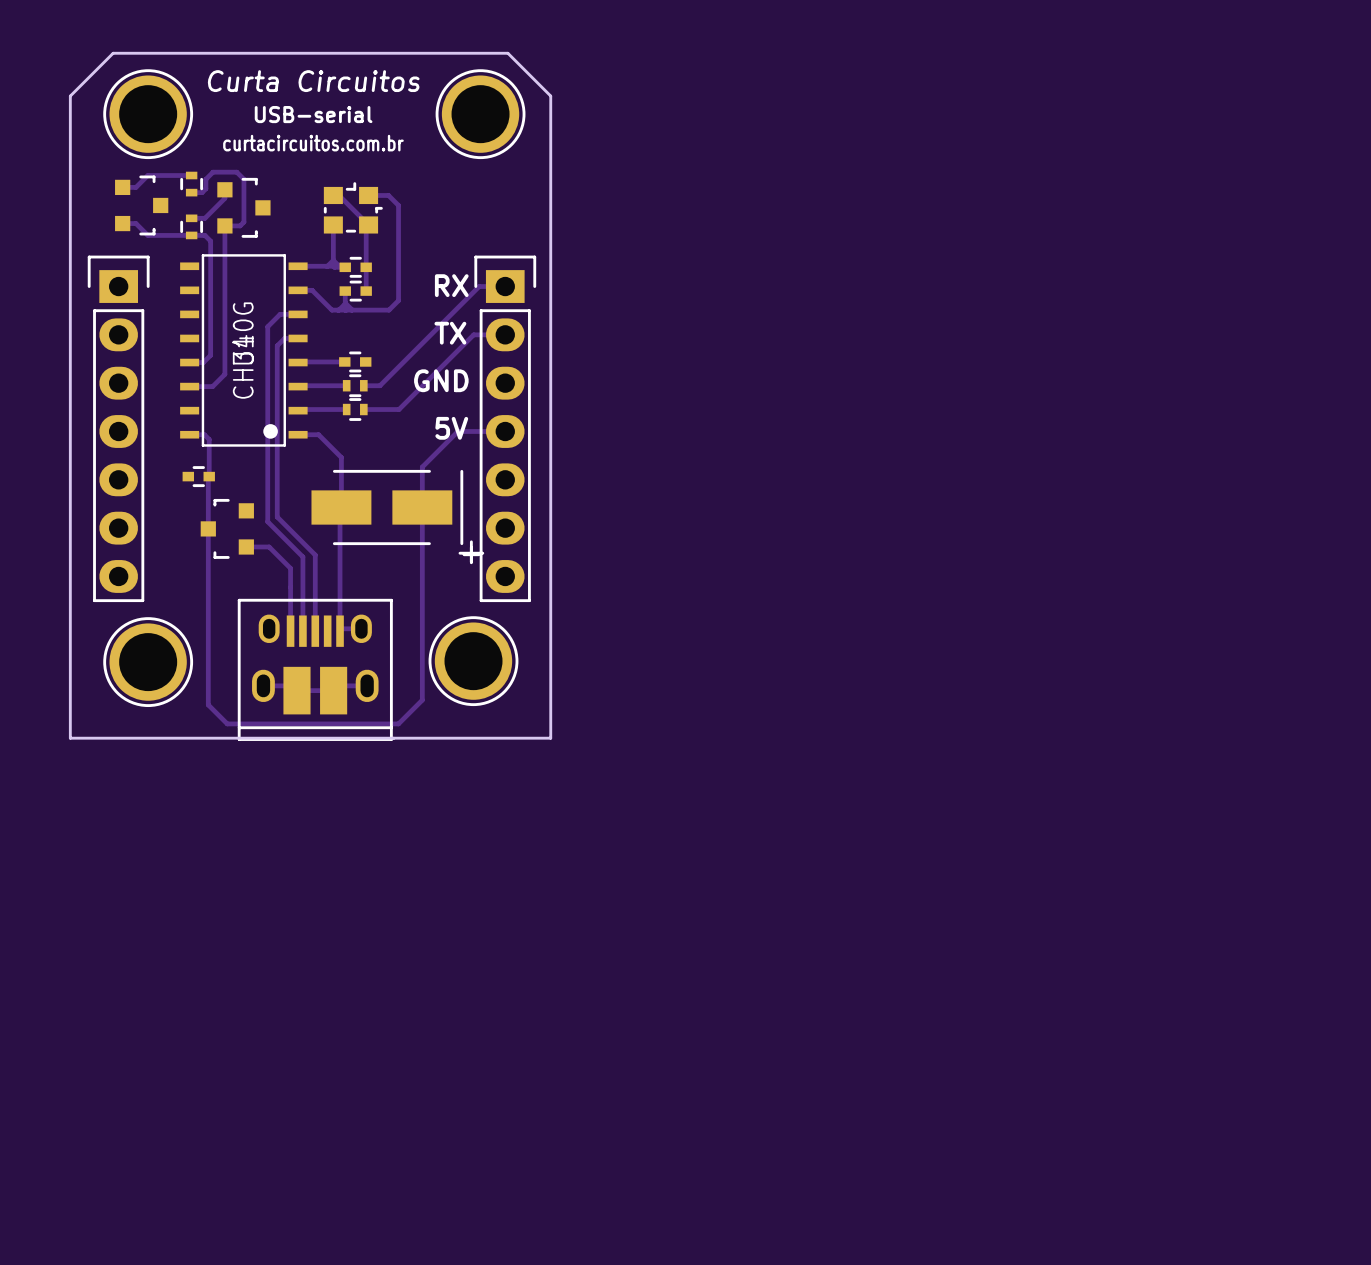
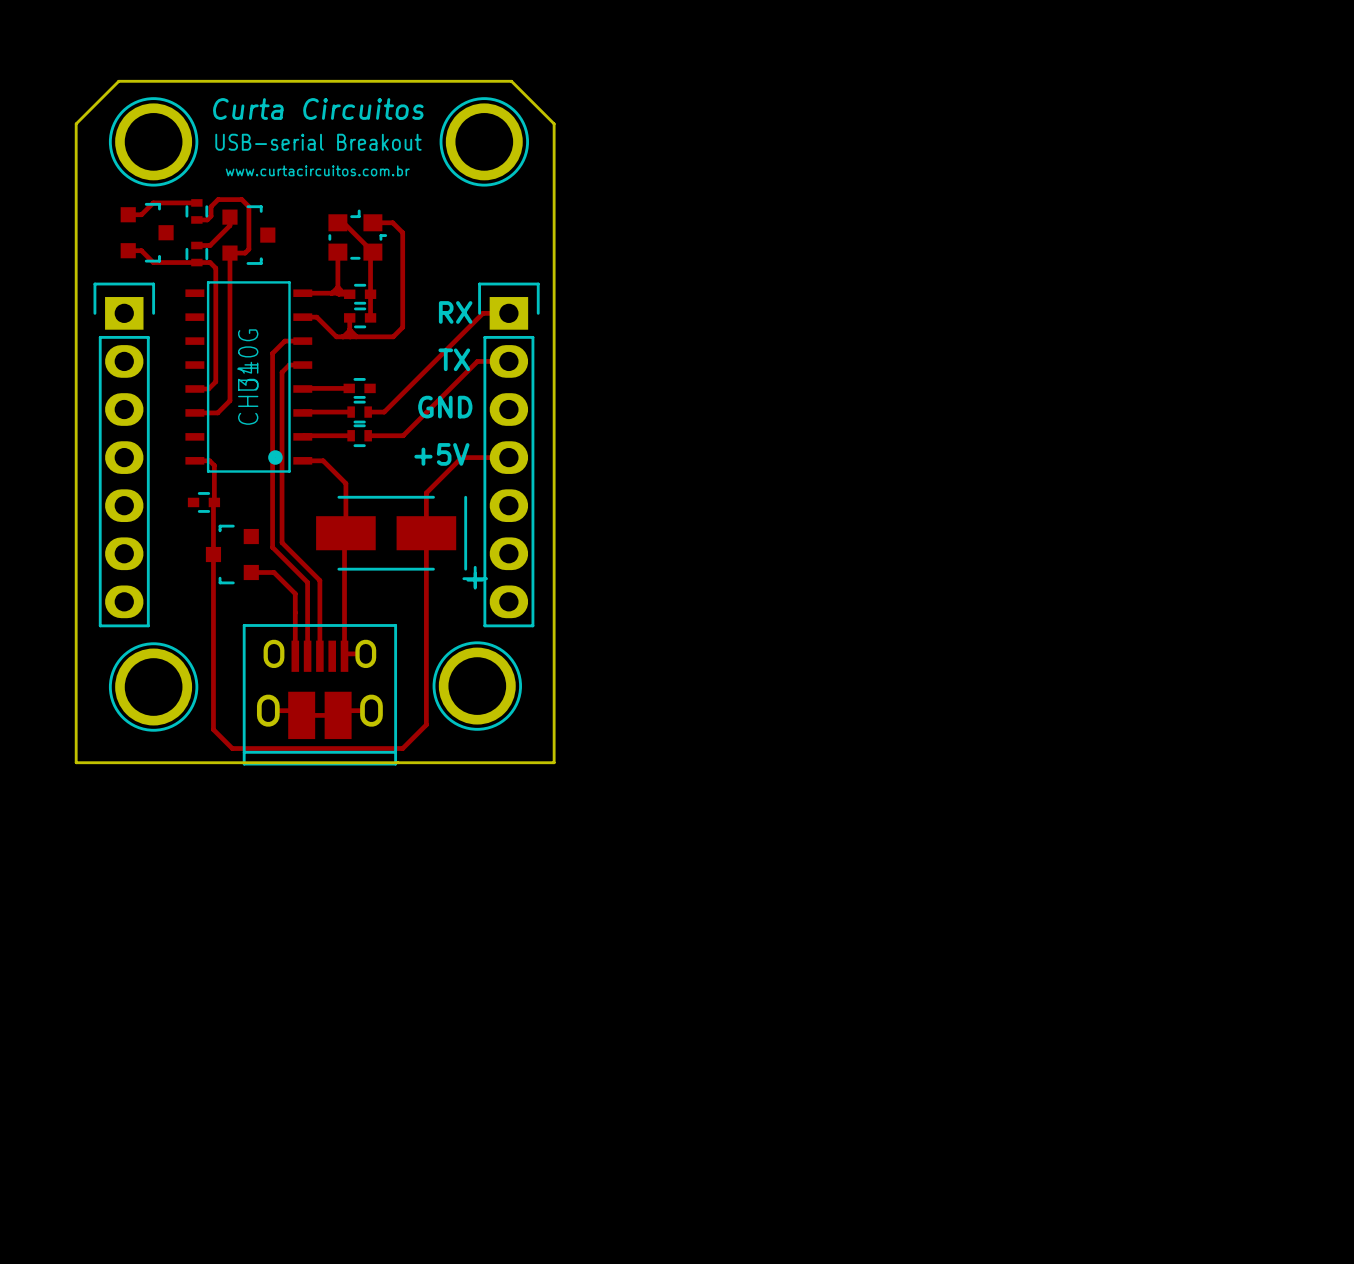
text: USB-serial (313, 114) -> USB-serial Breakout (318, 142)
text: curtacircuitos.com.br (313, 143) -> www.curtacircuitos.com.br (317, 170)
text: 5V (451, 428) -> +5V (441, 454)

